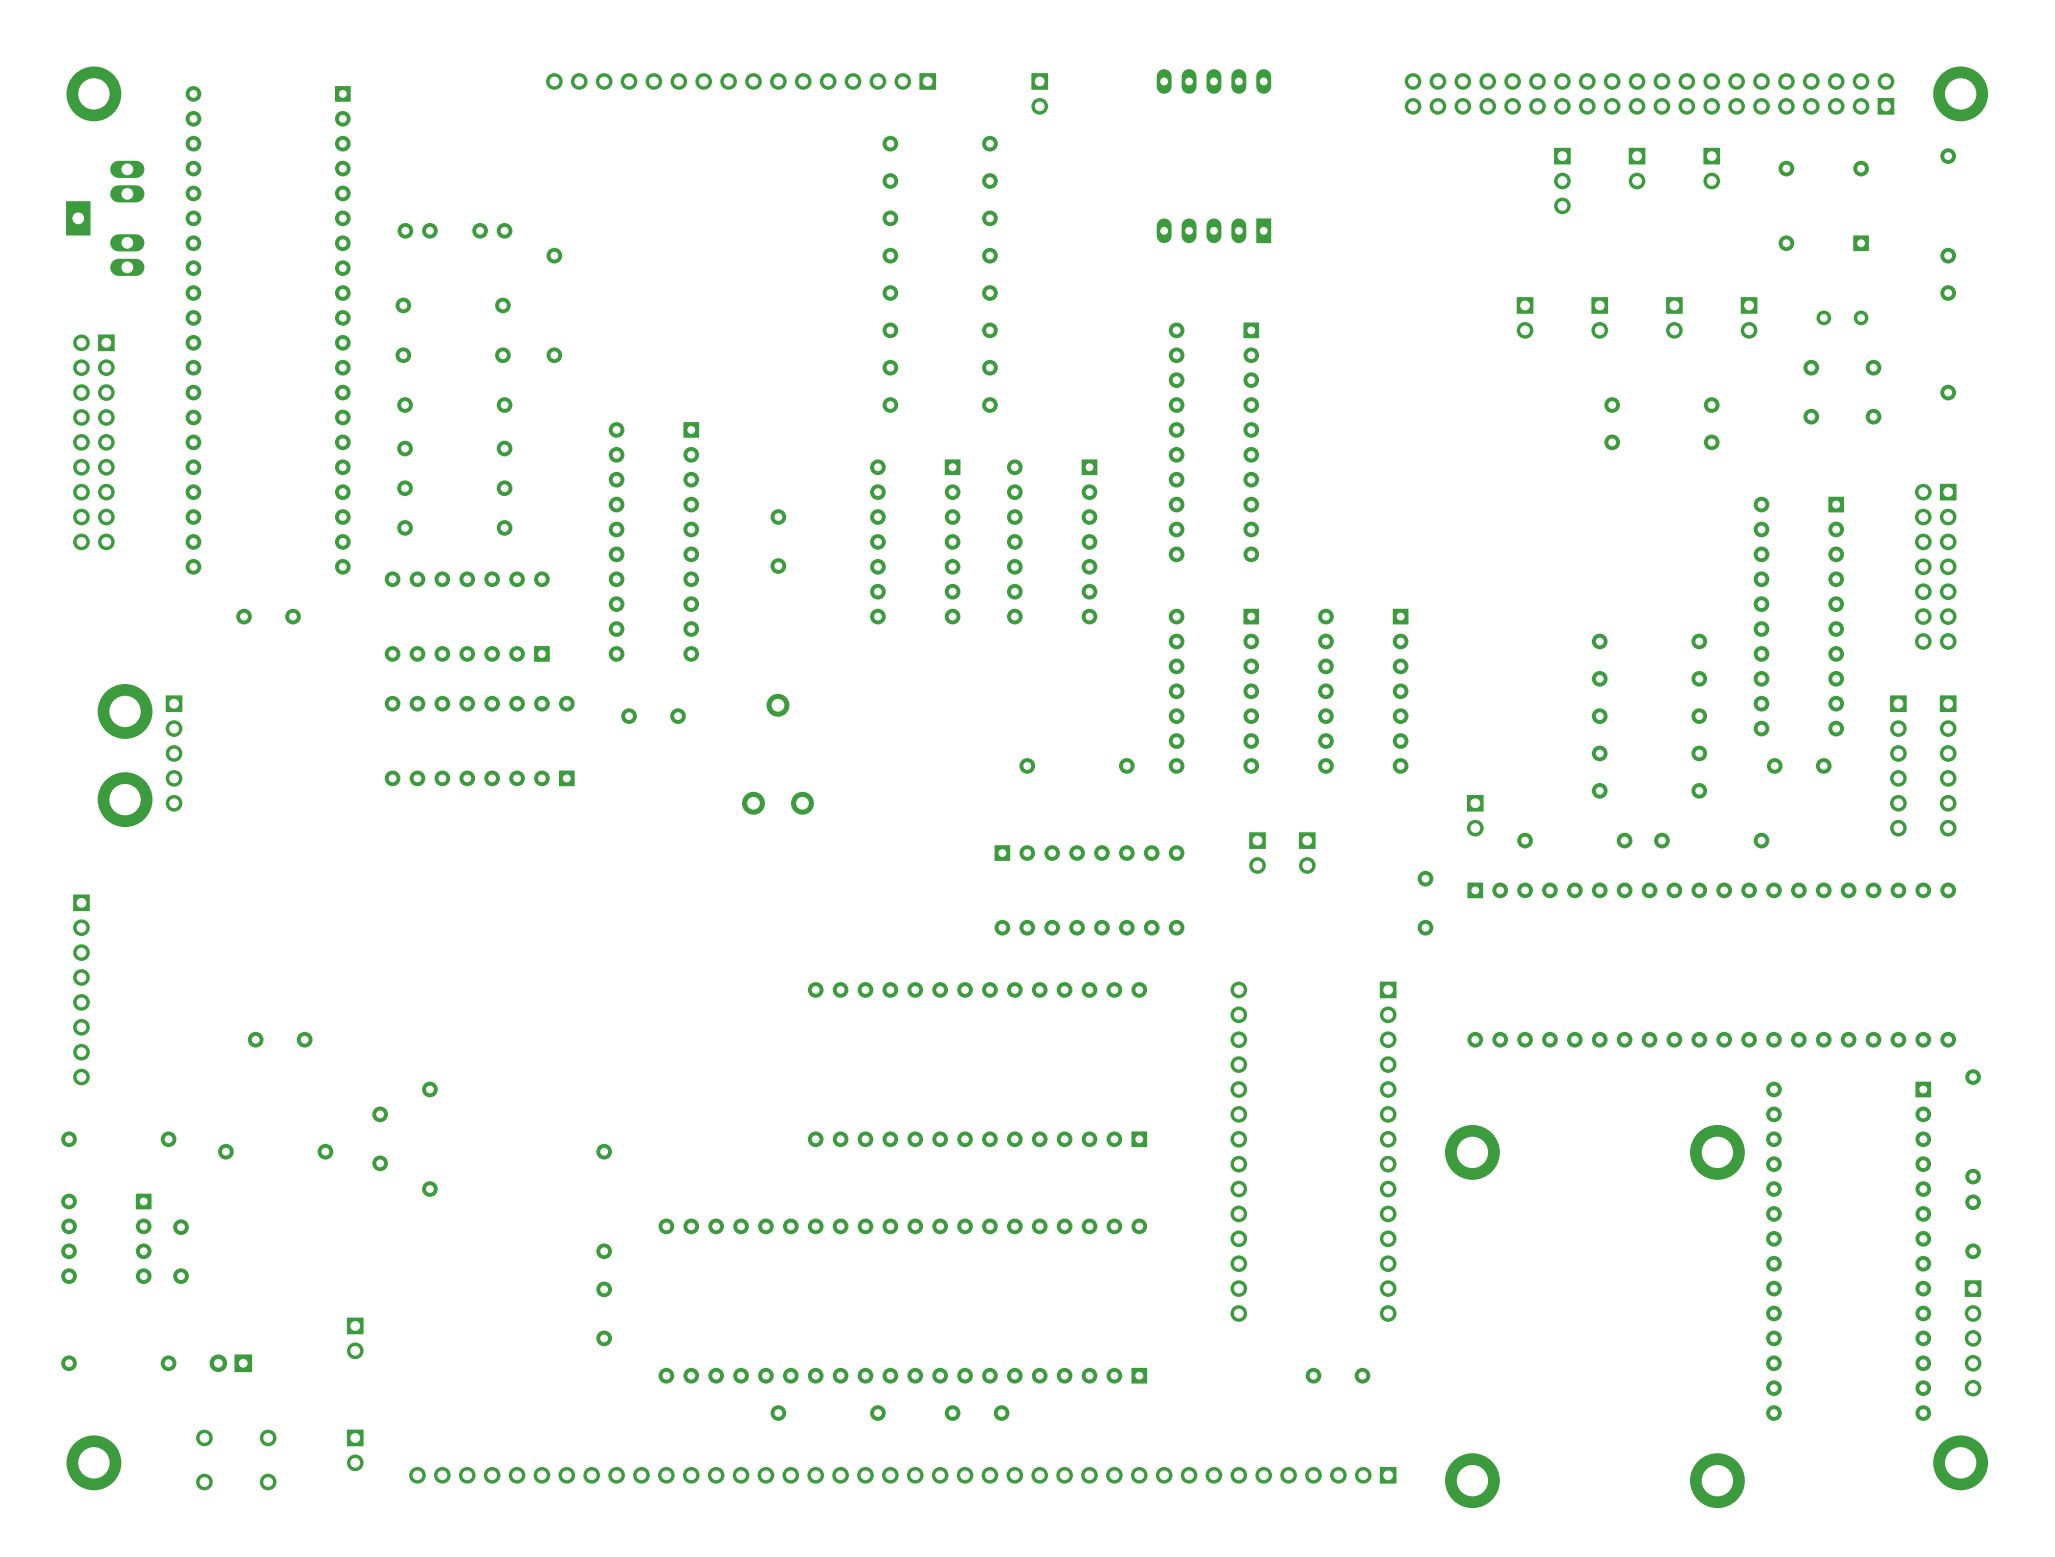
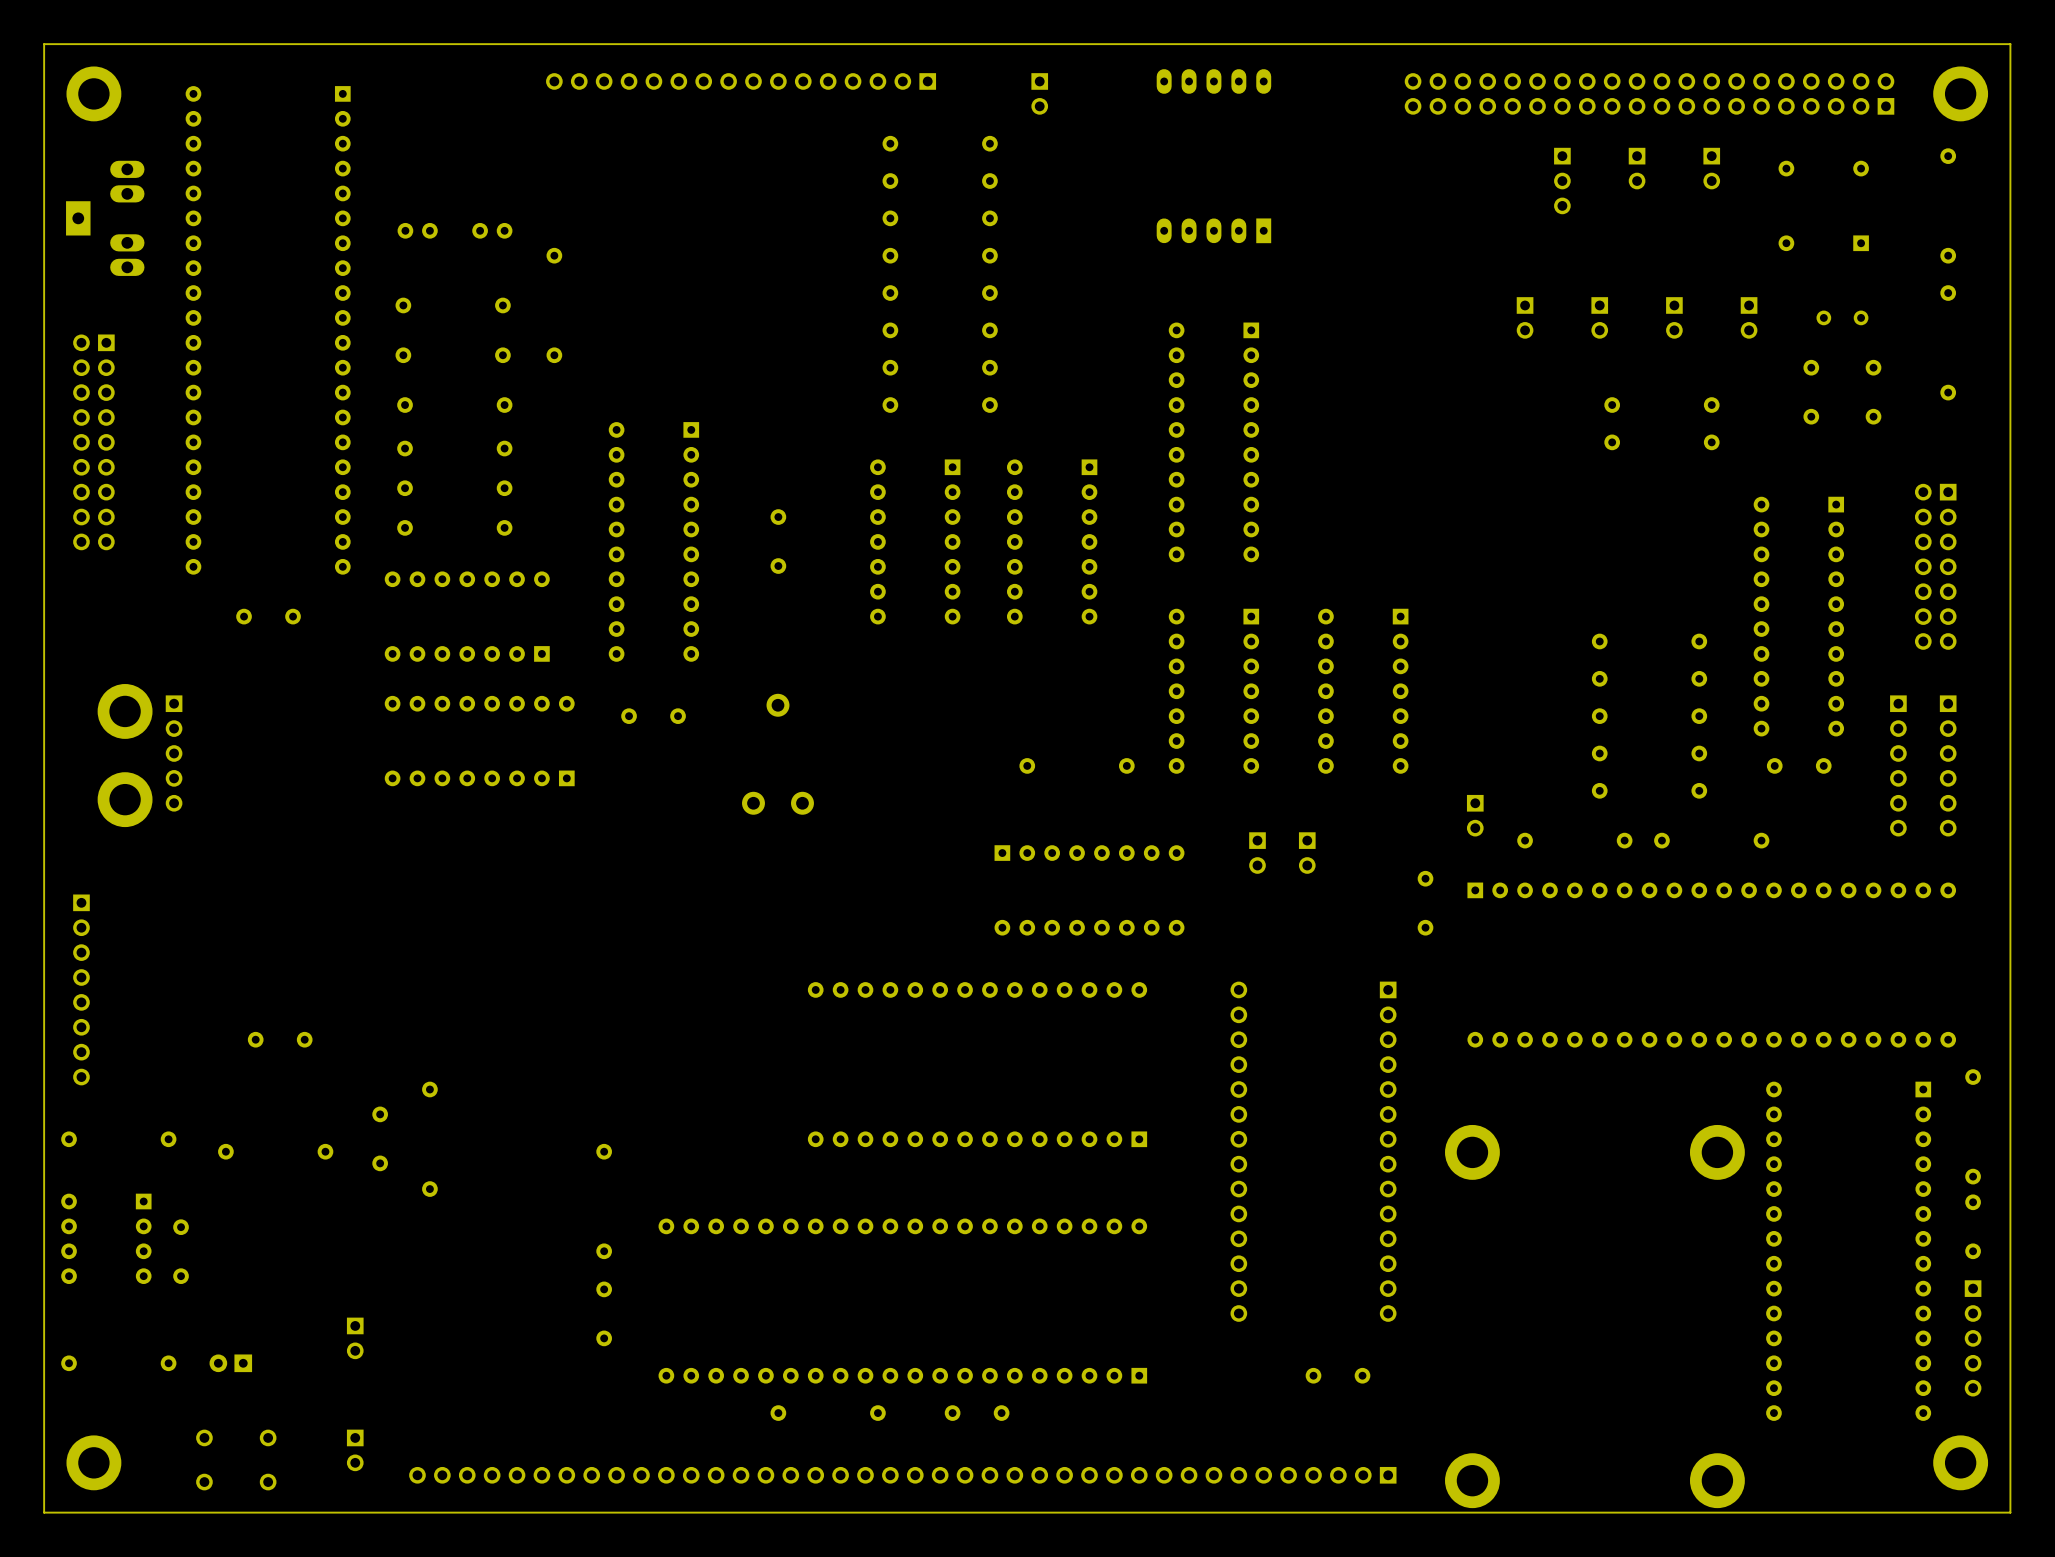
board edge: none -> (2010, 44) (2010, 1512) (44, 1512) (44, 44) (2010, 44)

